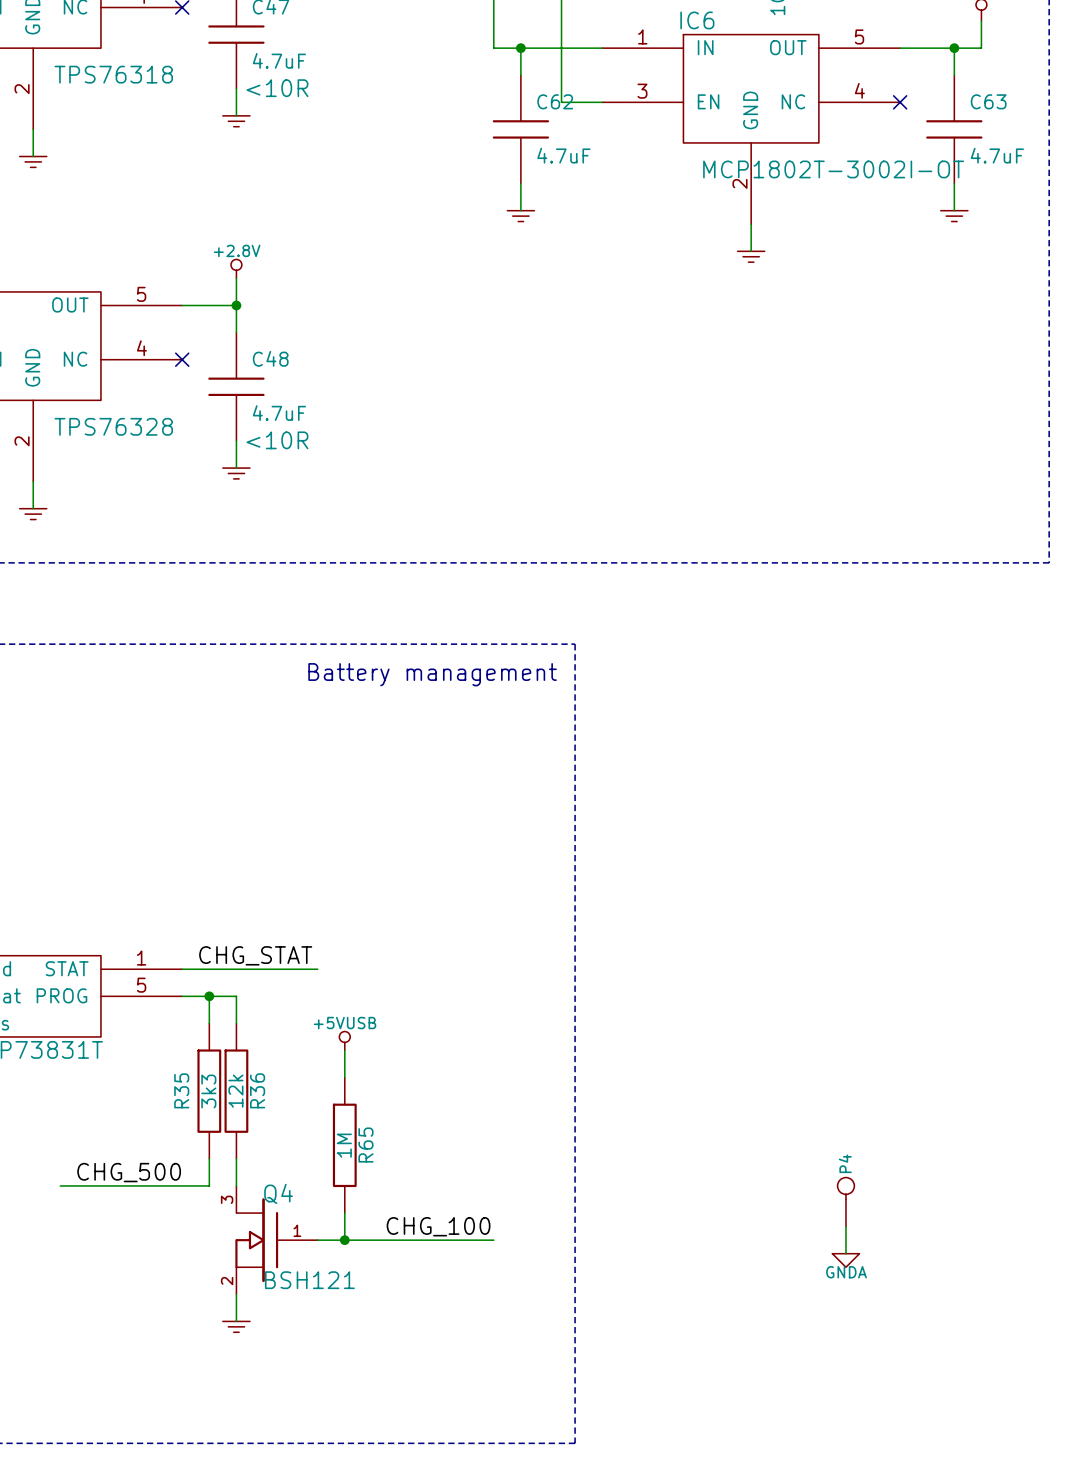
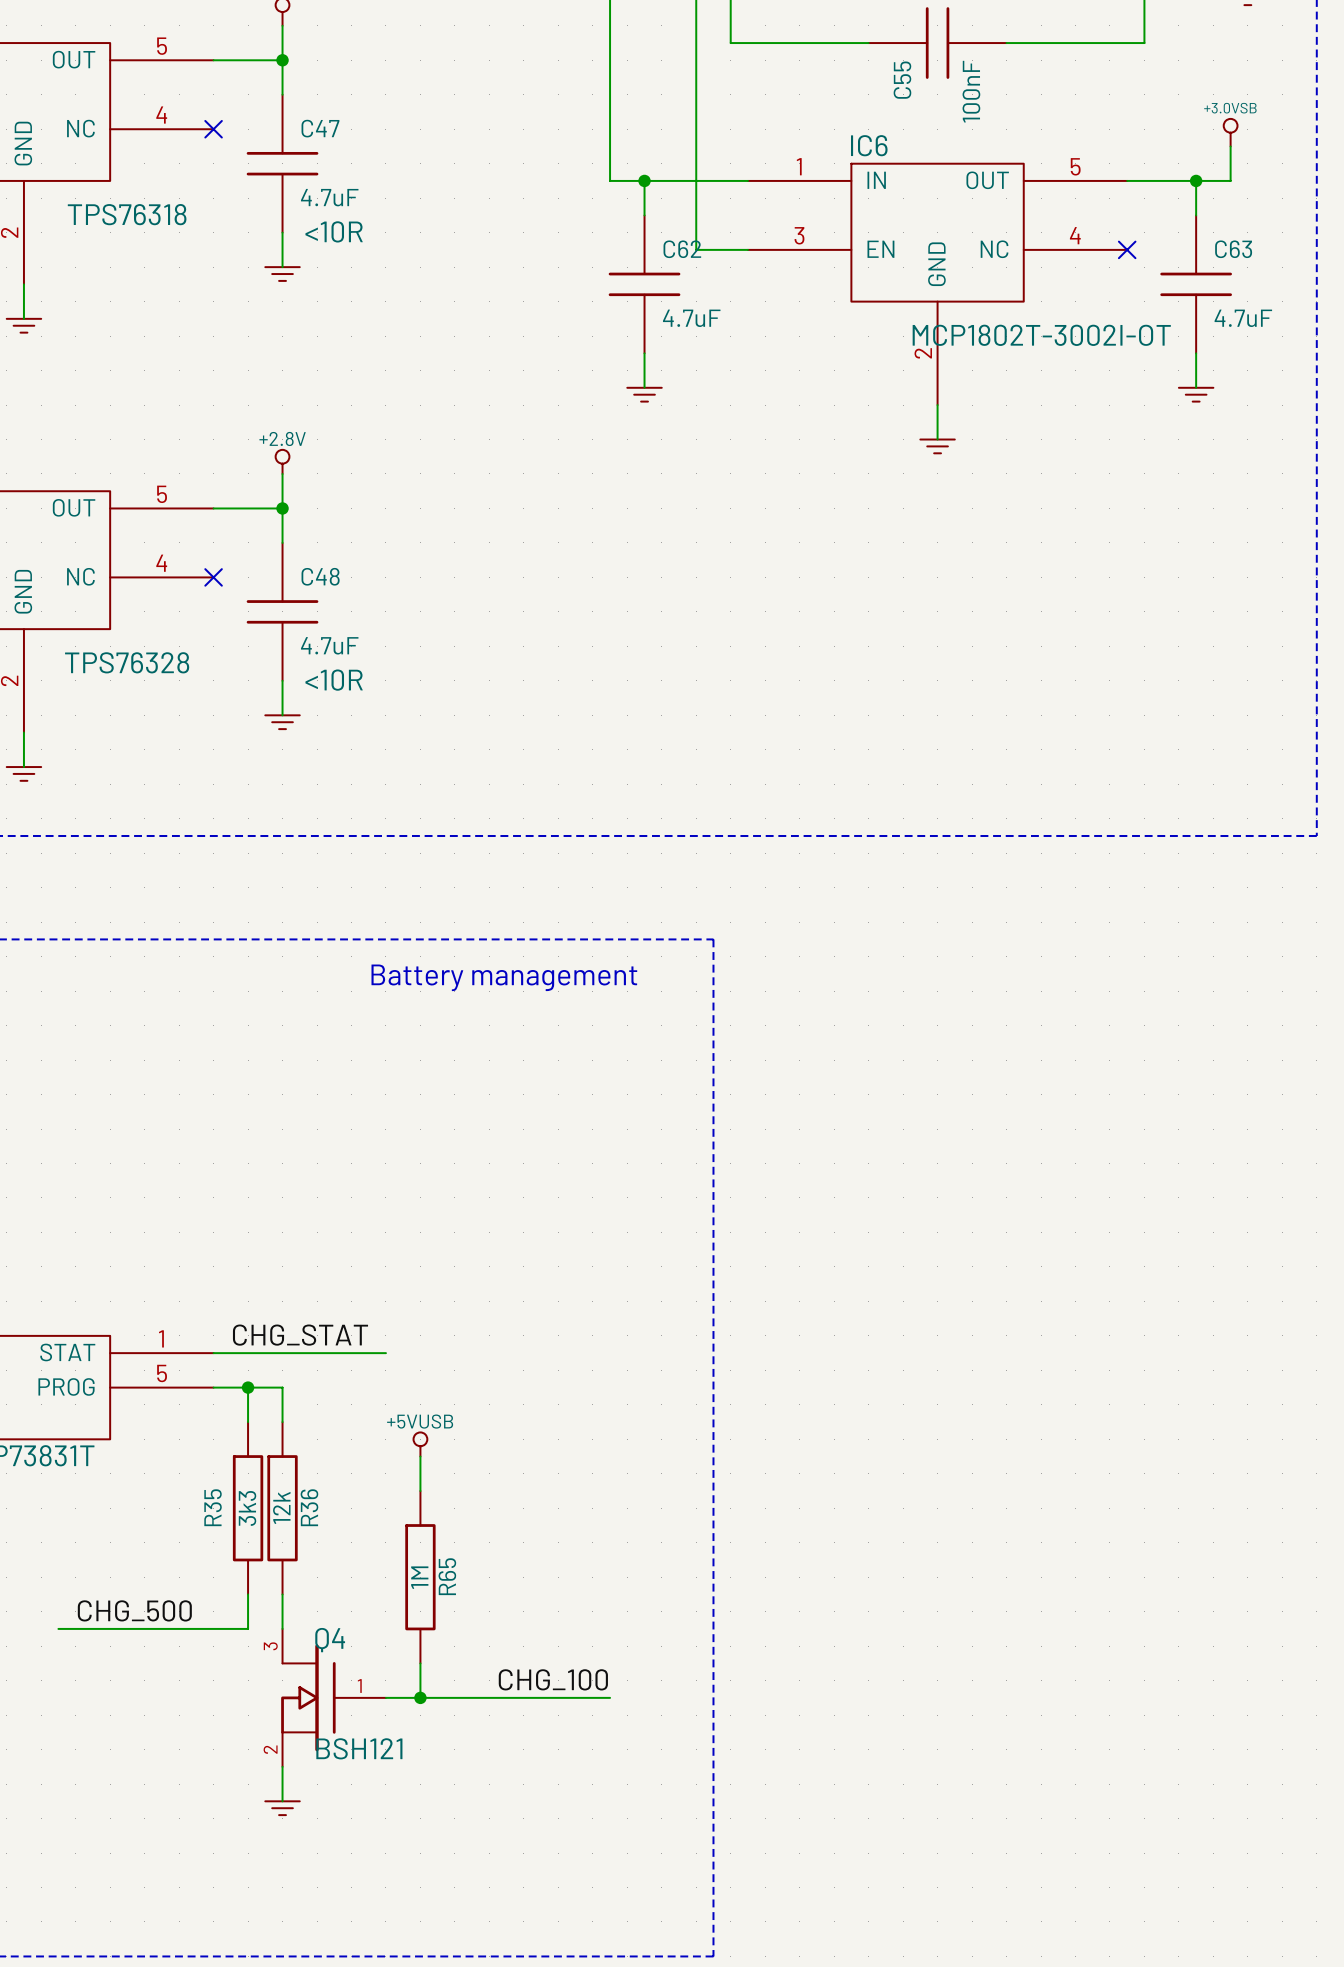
P4: (845, 1202) -> none
wire: (845, 1226) (845, 1253) -> none
power symbol: GNDA (845, 1260) -> none

